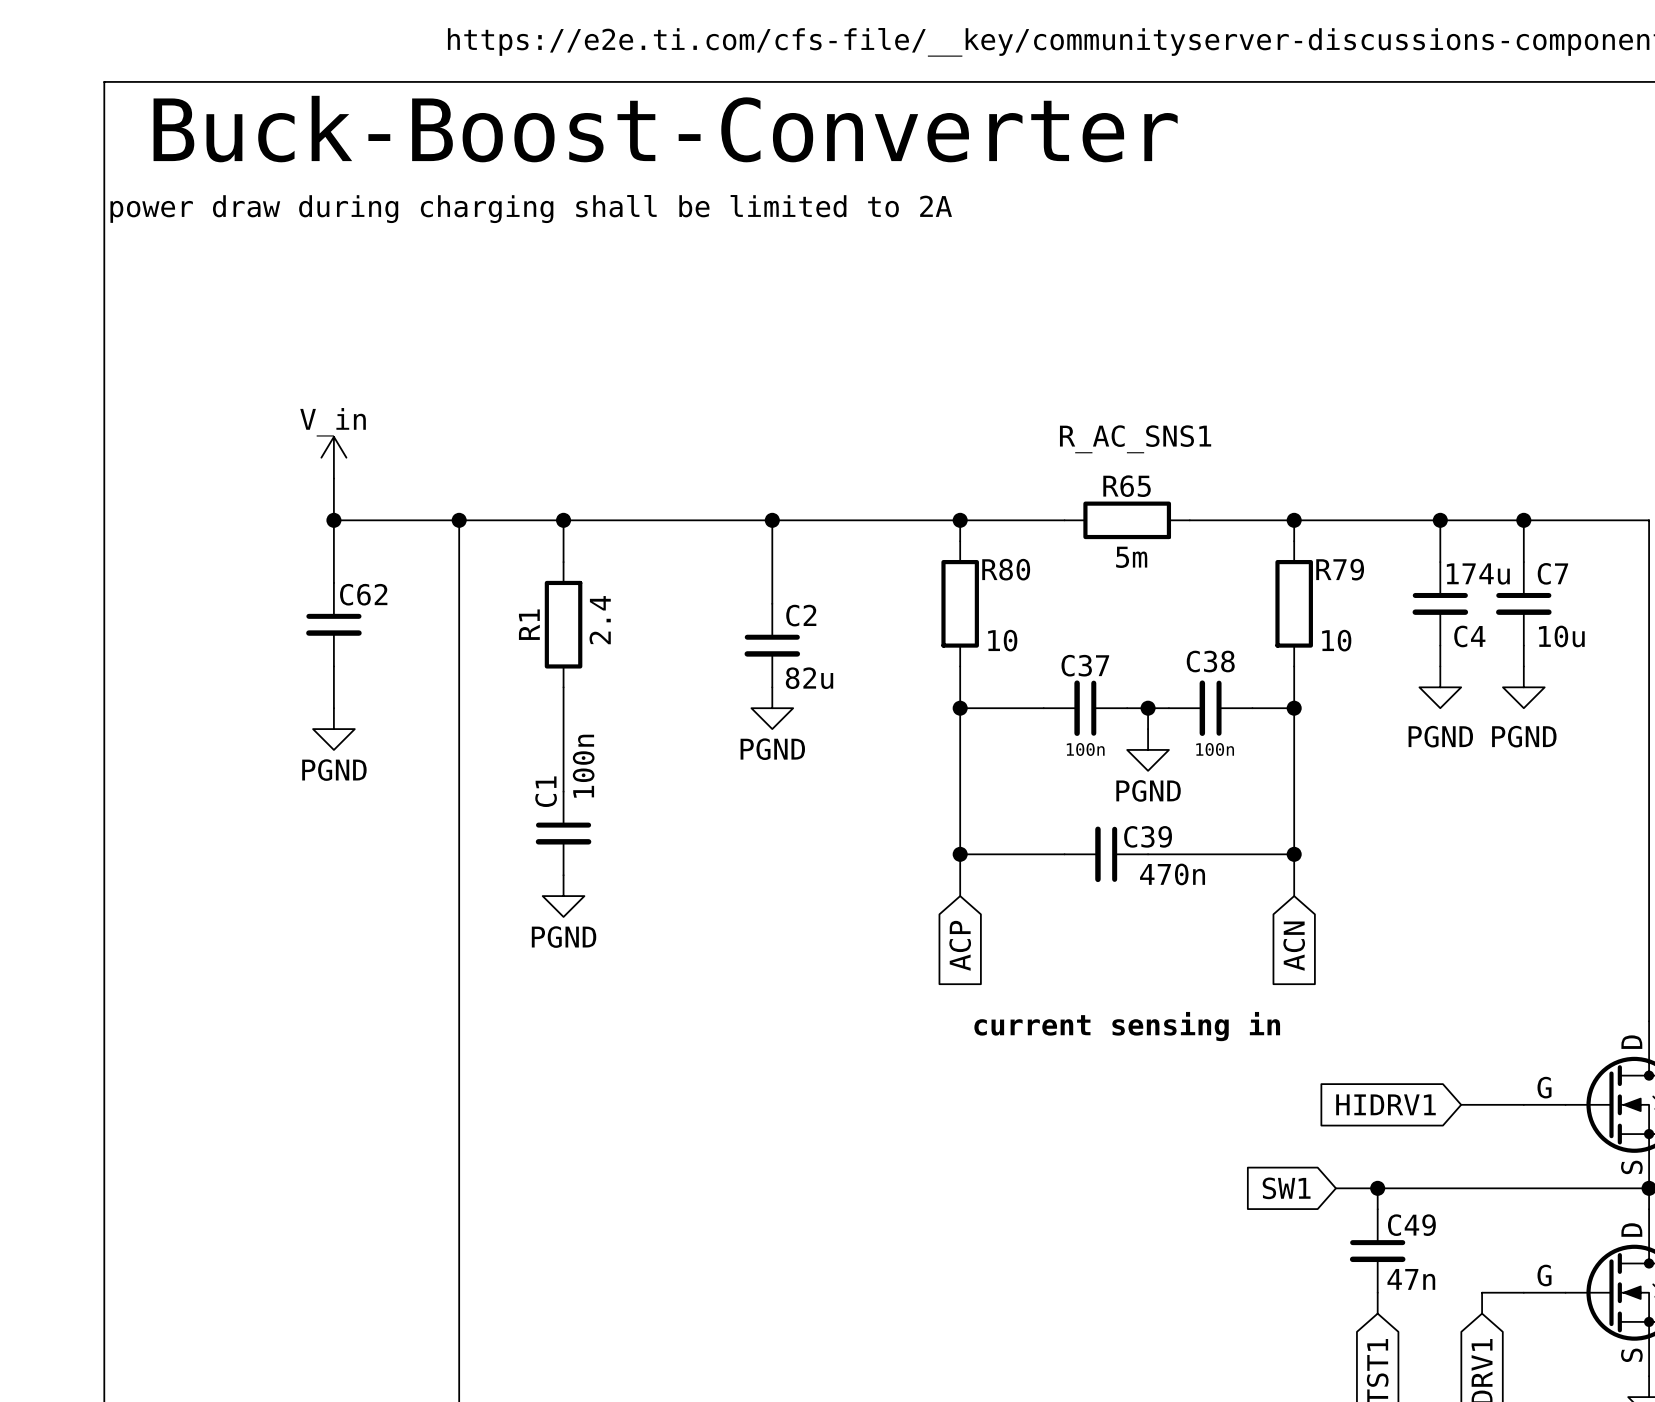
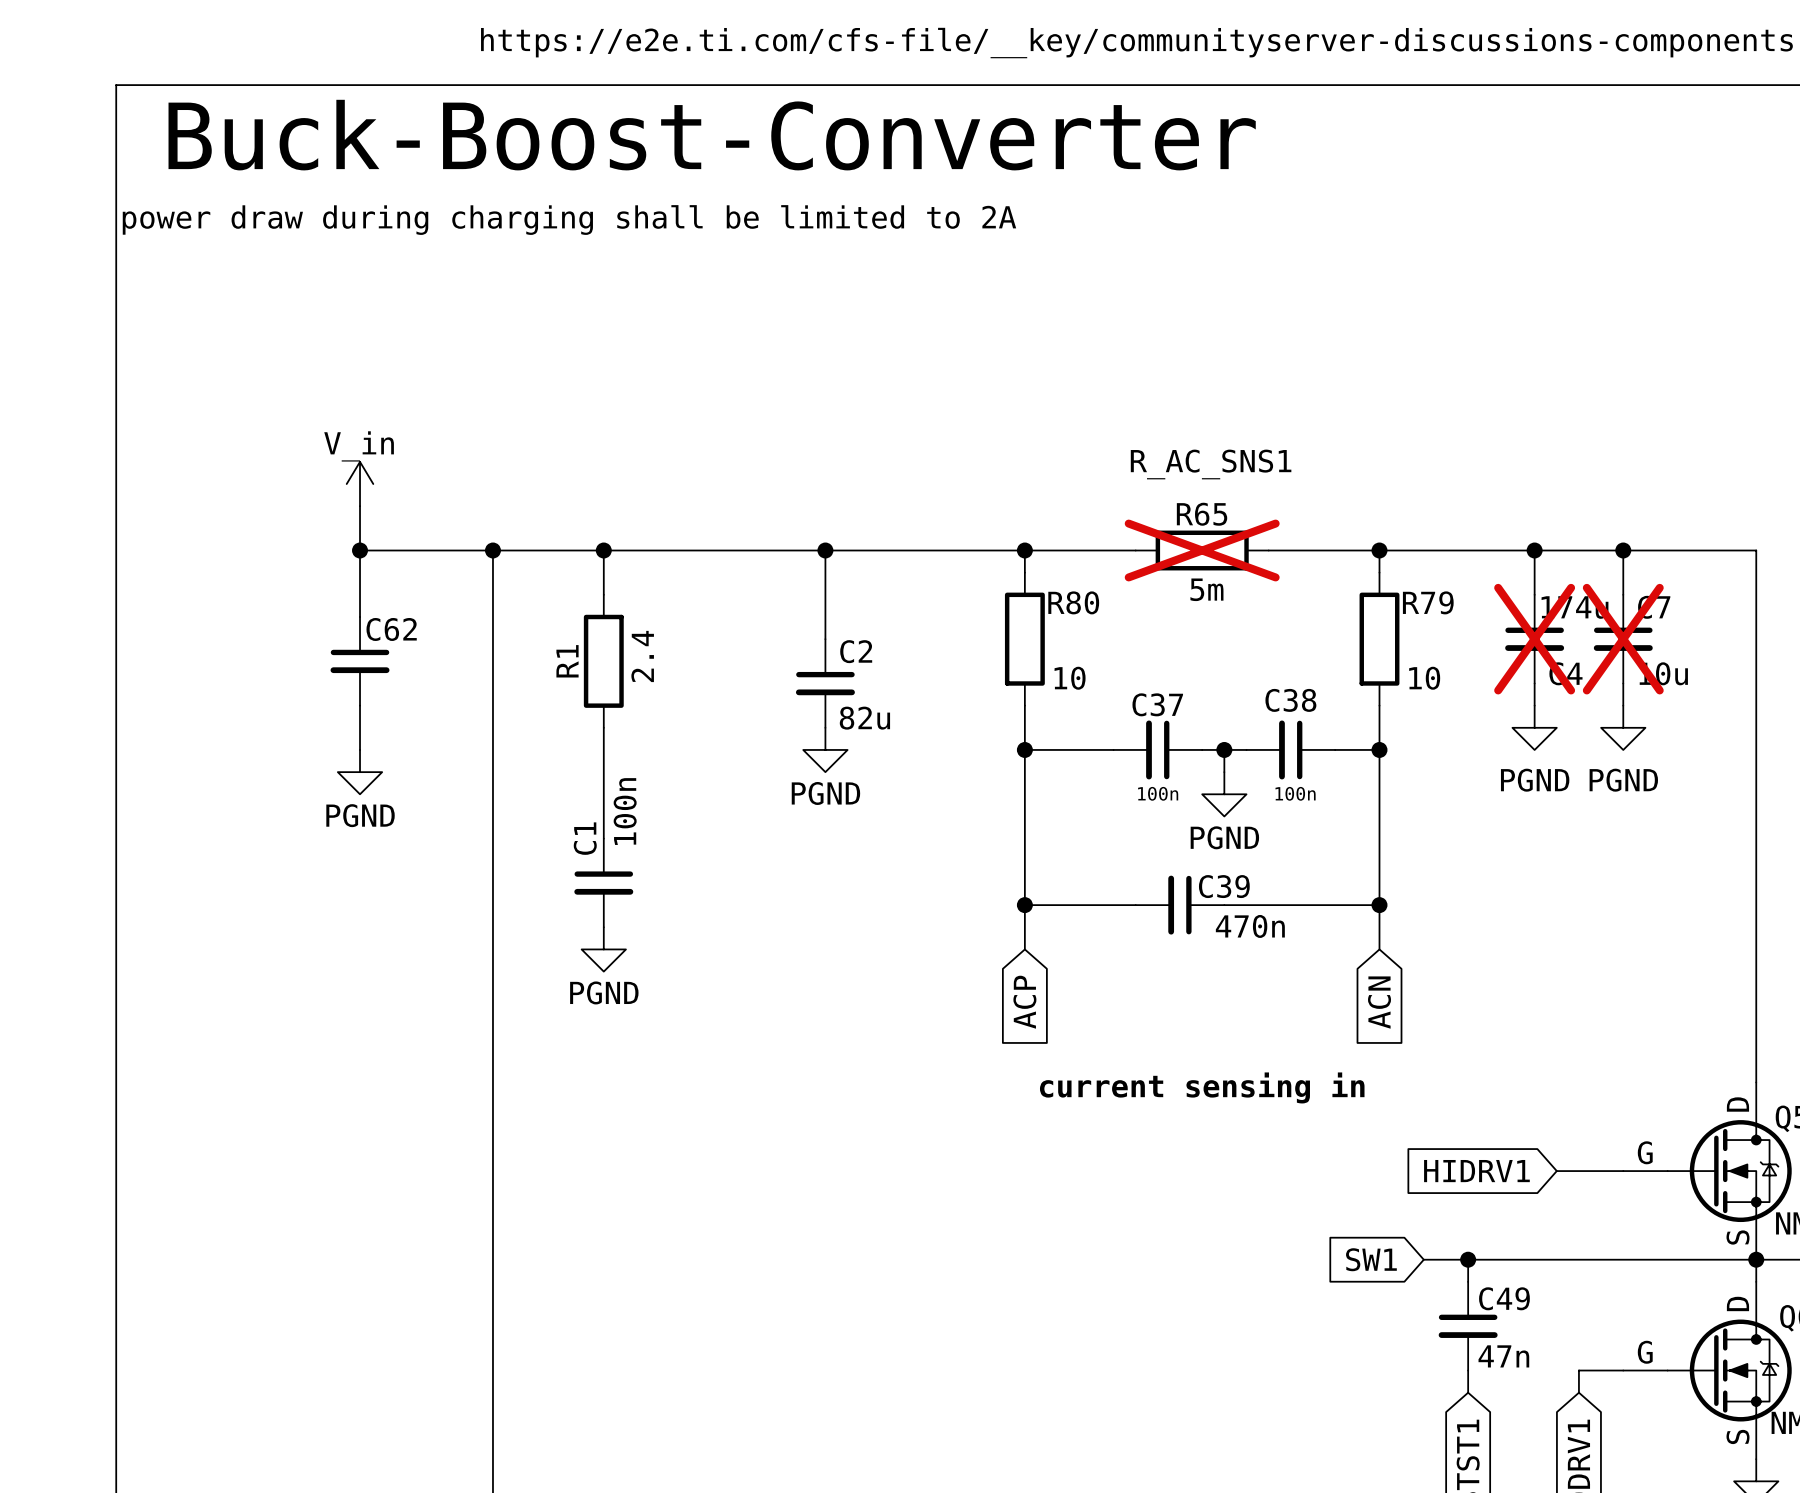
R65 do-not-place cross: none -> (1202, 550)
C4 do-not-place cross: none -> (1534, 639)
C7 do-not-place cross: none -> (1623, 639)

